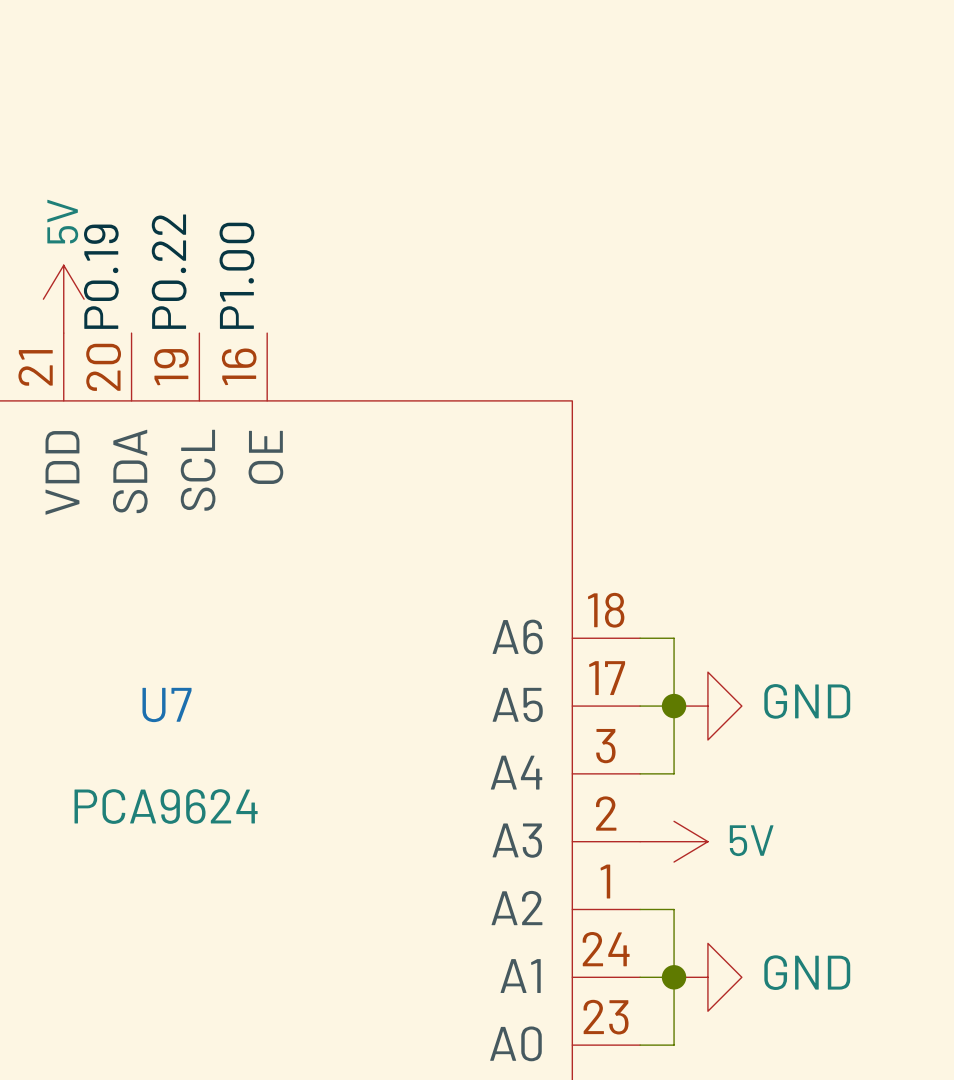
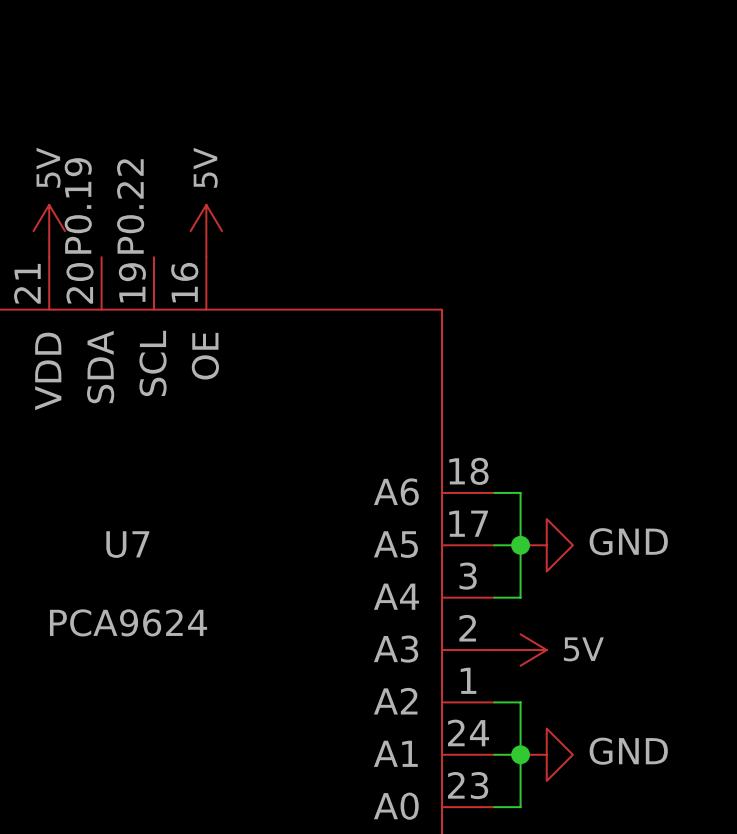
label: P1.00 (236, 275) -> none
power symbol: none -> 5V (206, 231)

